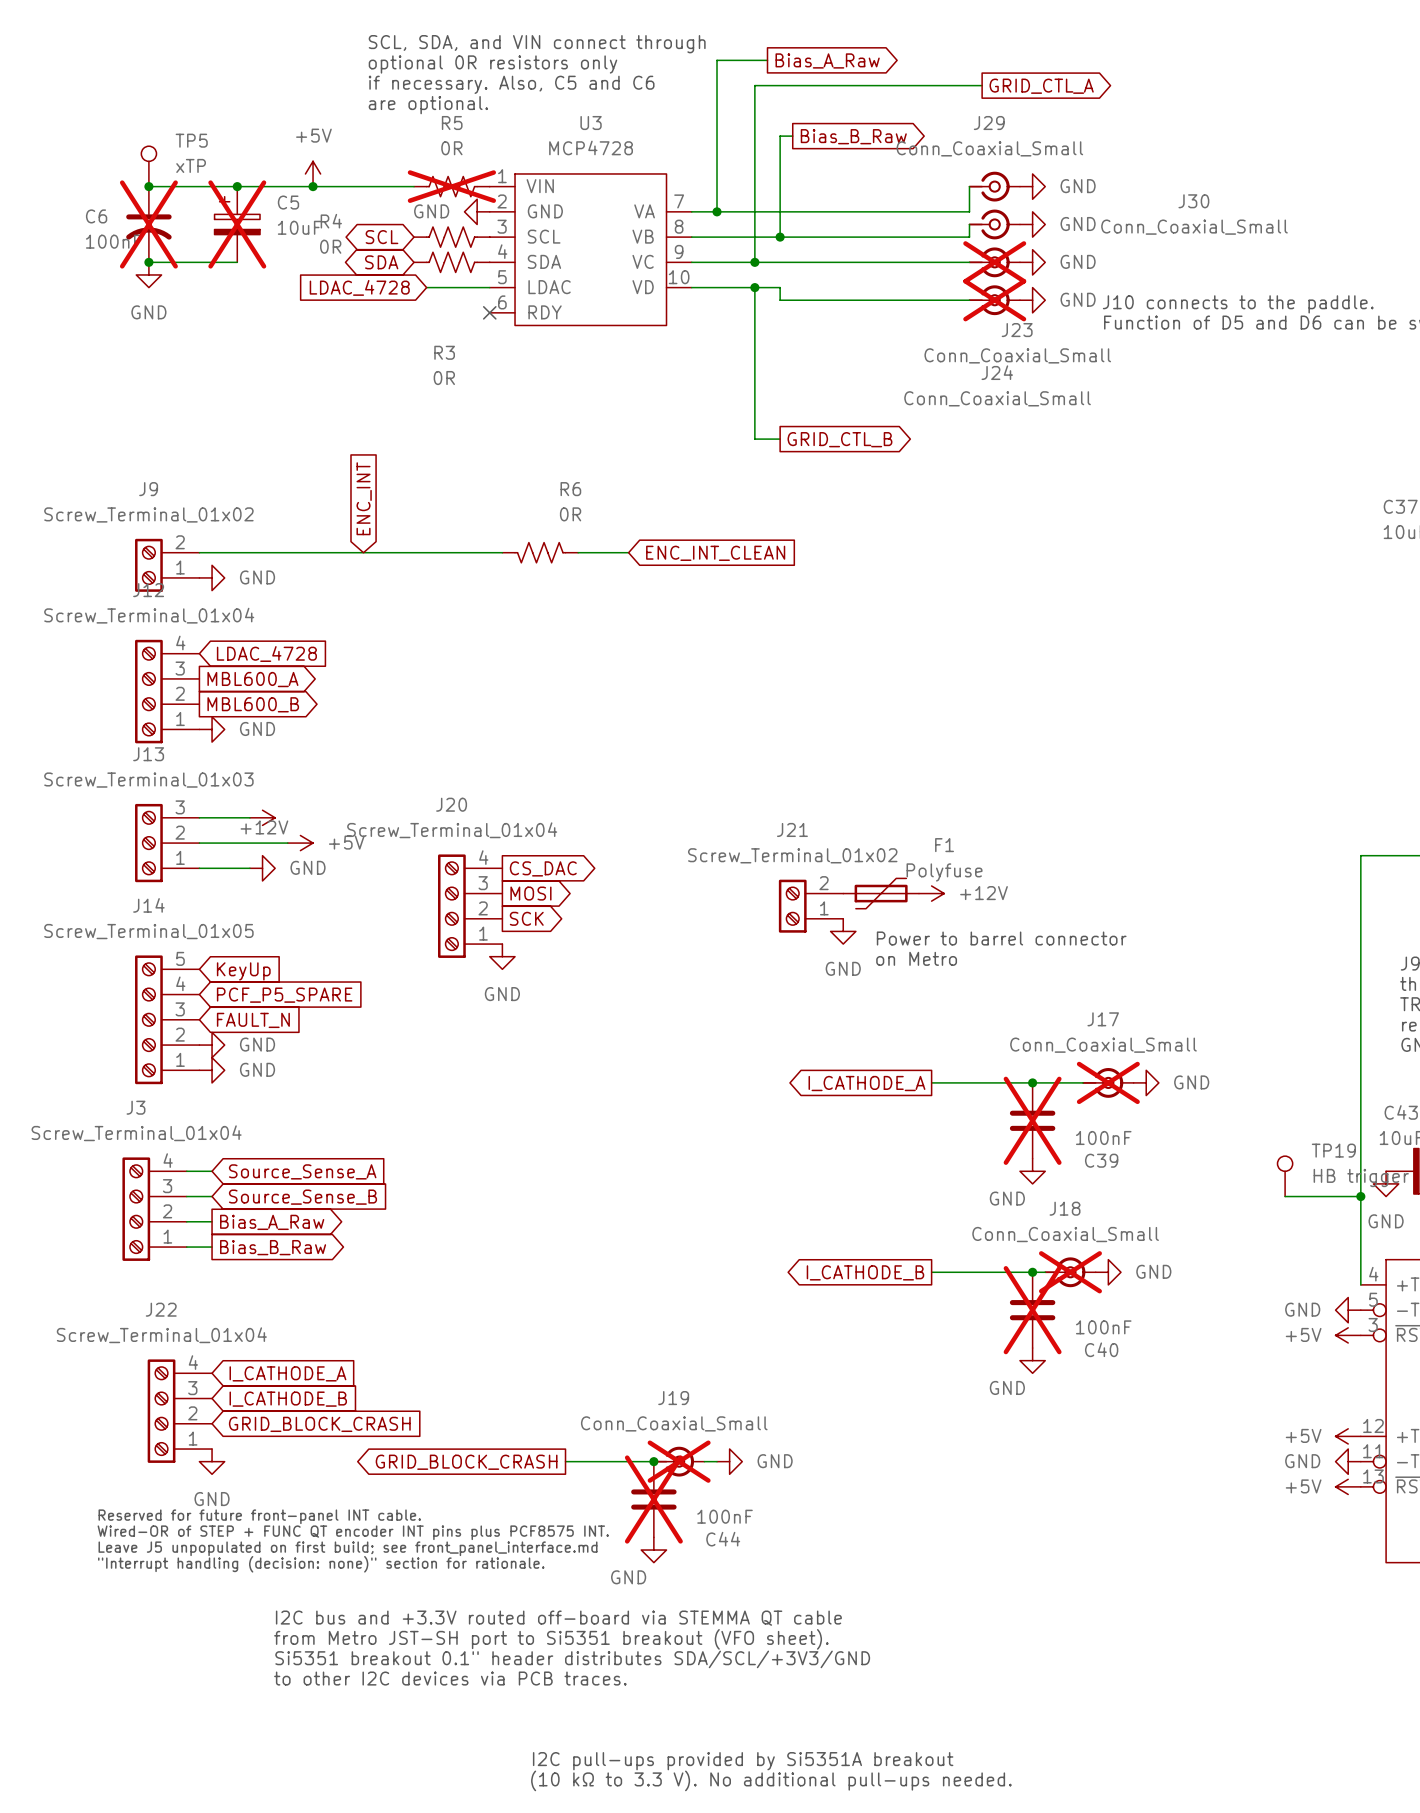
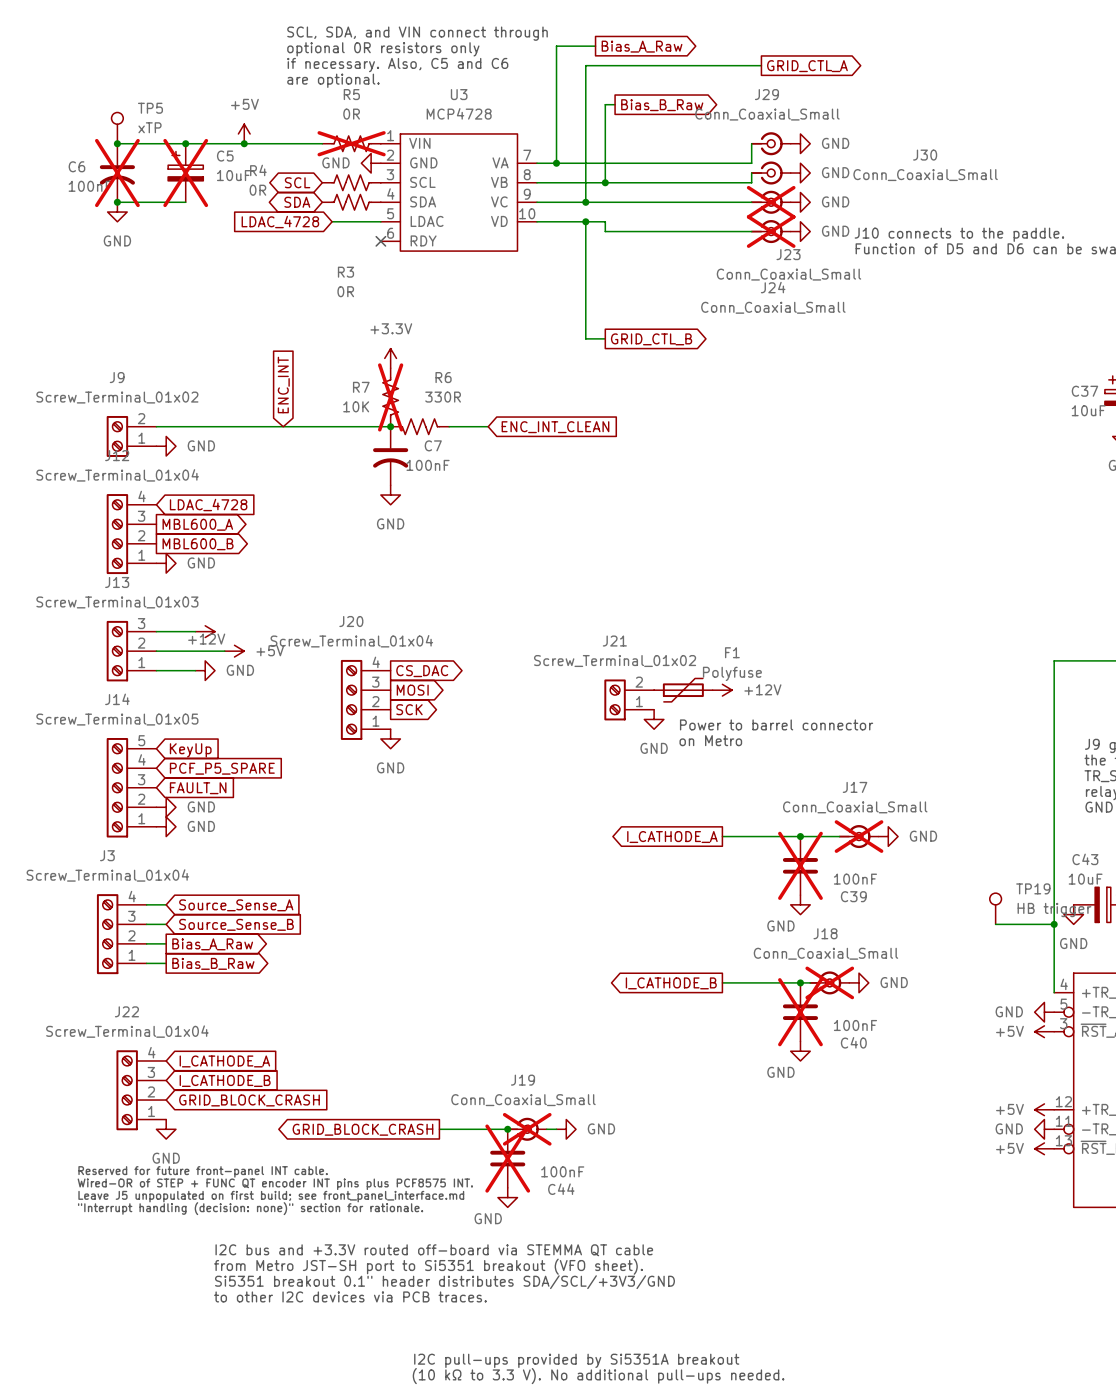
power symbol: none -> +3.3V (390, 358)
R7: none -> 10K (390, 397)
R6 value: 0R (570, 514) -> 330R (443, 397)
junction: none -> (390, 426)
C7: none -> 100nF (390, 455)
power symbol: none -> GND (390, 495)

